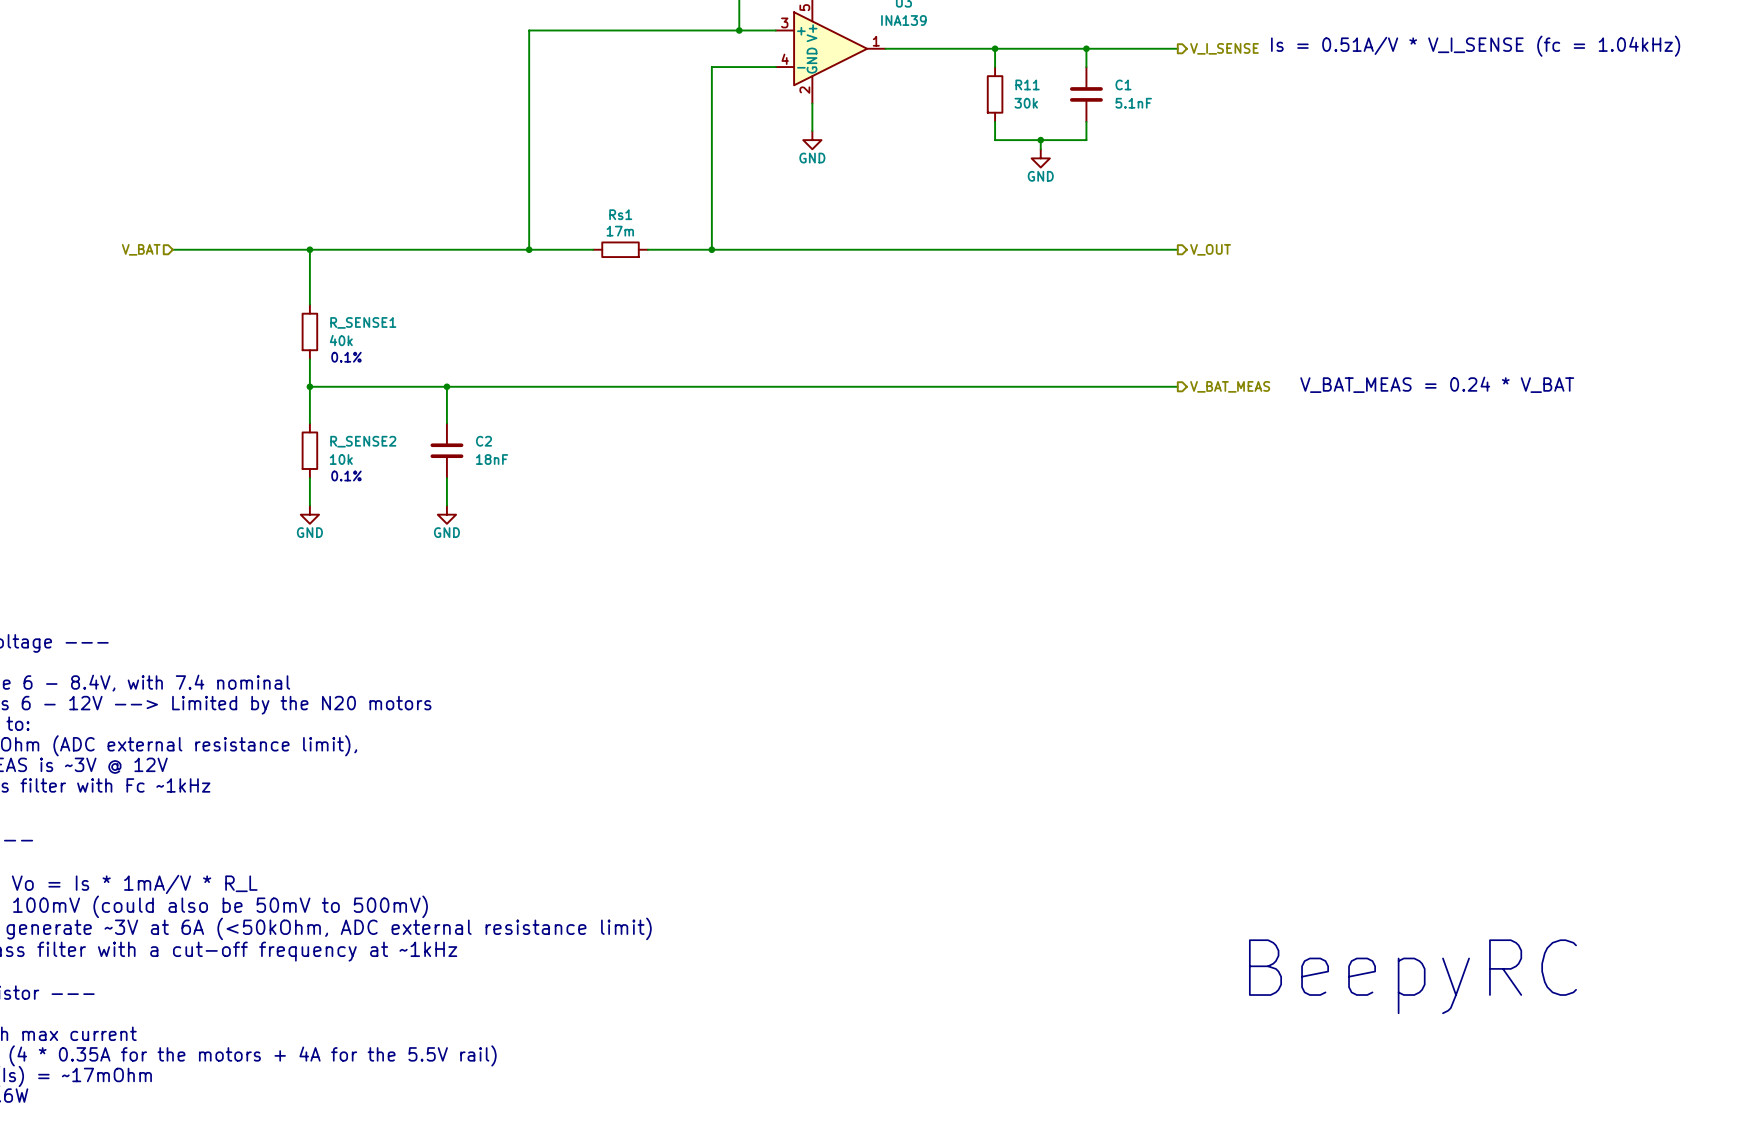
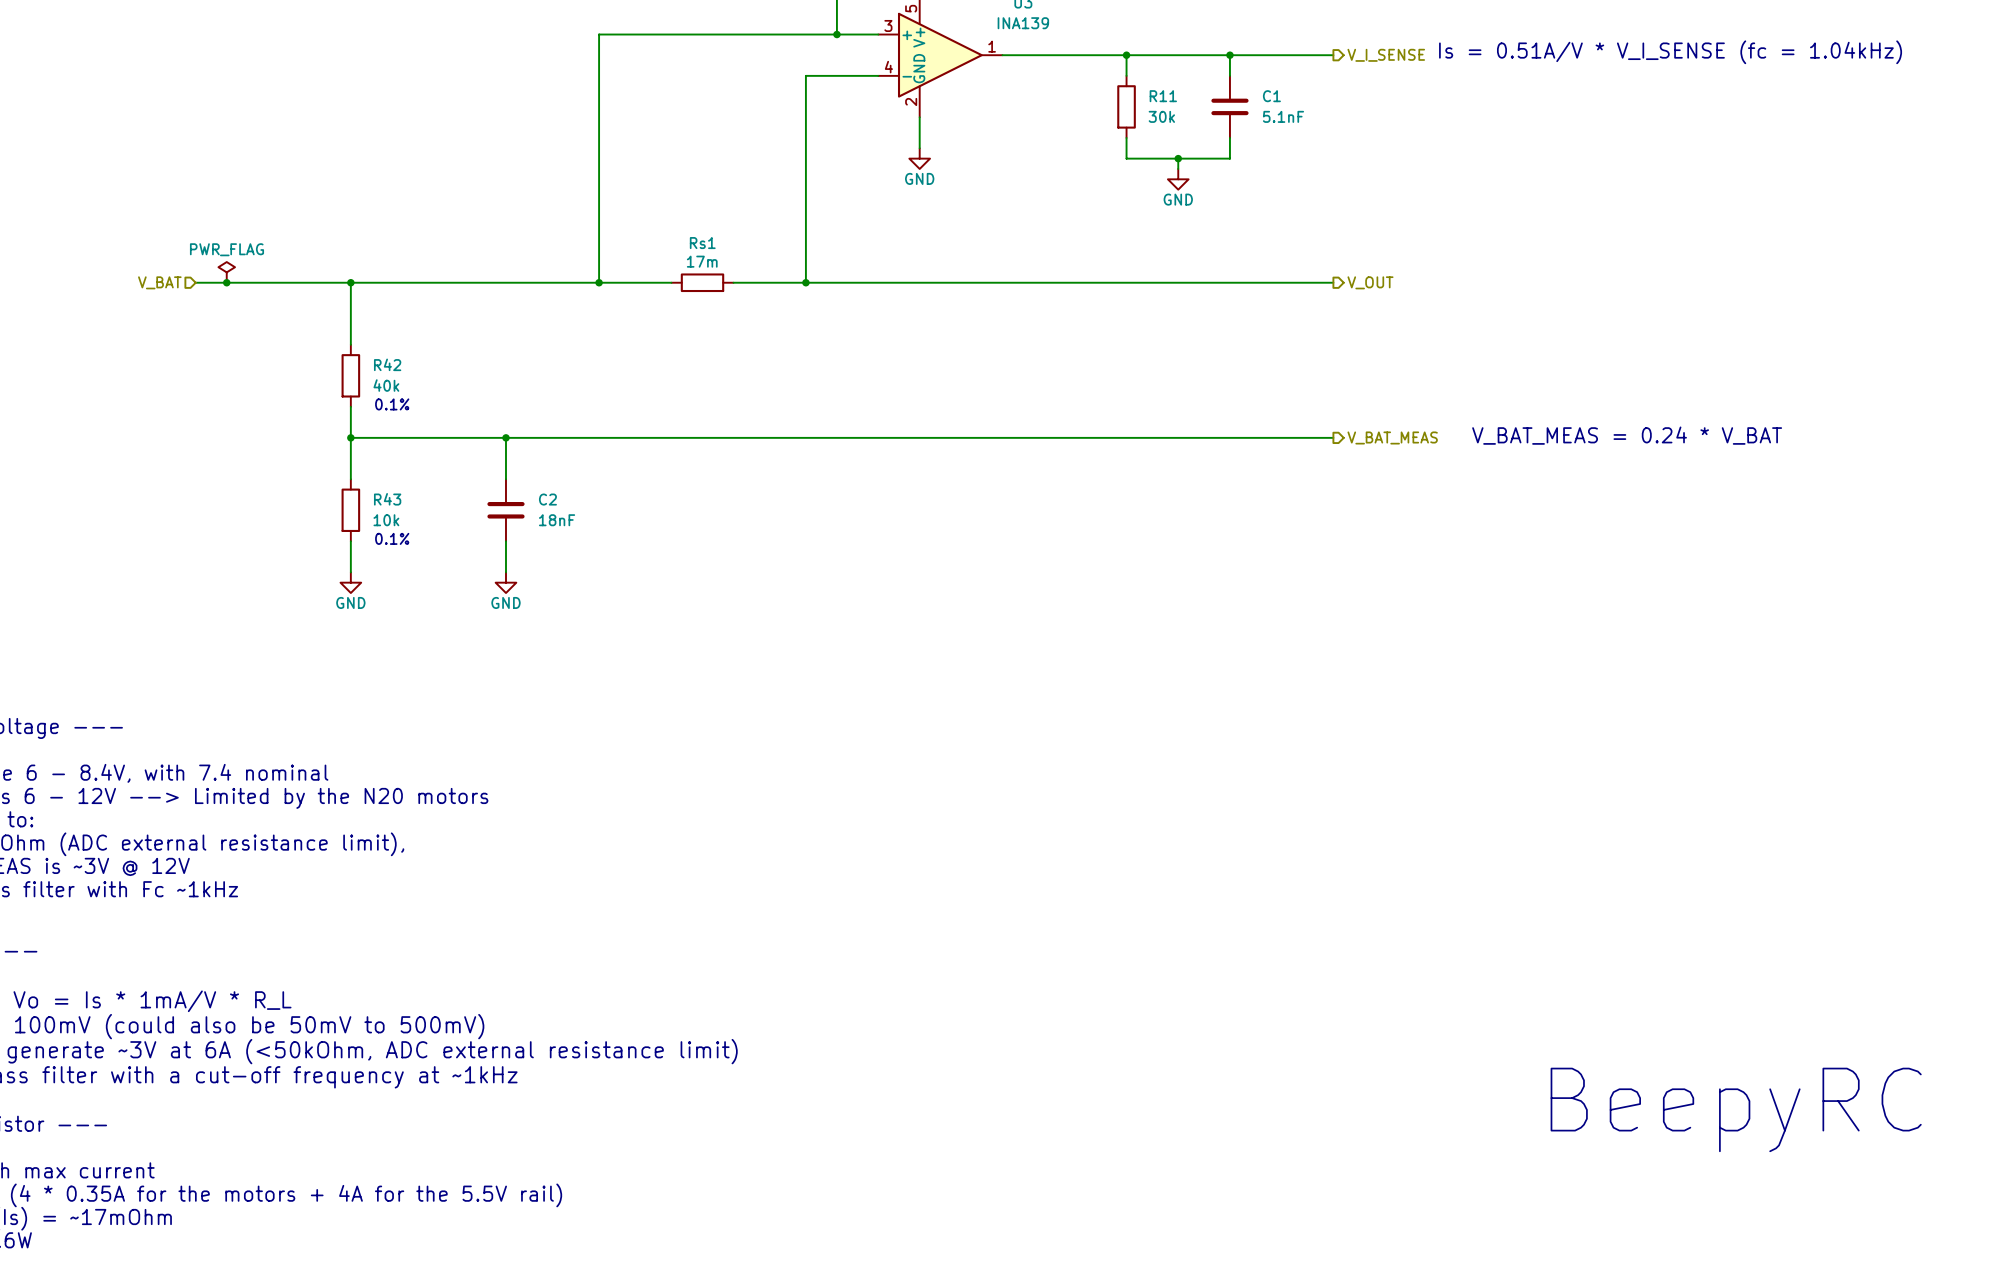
power symbol: none -> PWR_FLAG (226, 272)
junction: none -> (226, 282)
R_SENSE1 name: R_SENSE1 (363, 322) -> R42 (387, 364)
R_SENSE2 name: R_SENSE2 (363, 441) -> R43 (387, 499)
text position: BeepyRC (1412, 976) -> BeepyRC (1736, 1109)

